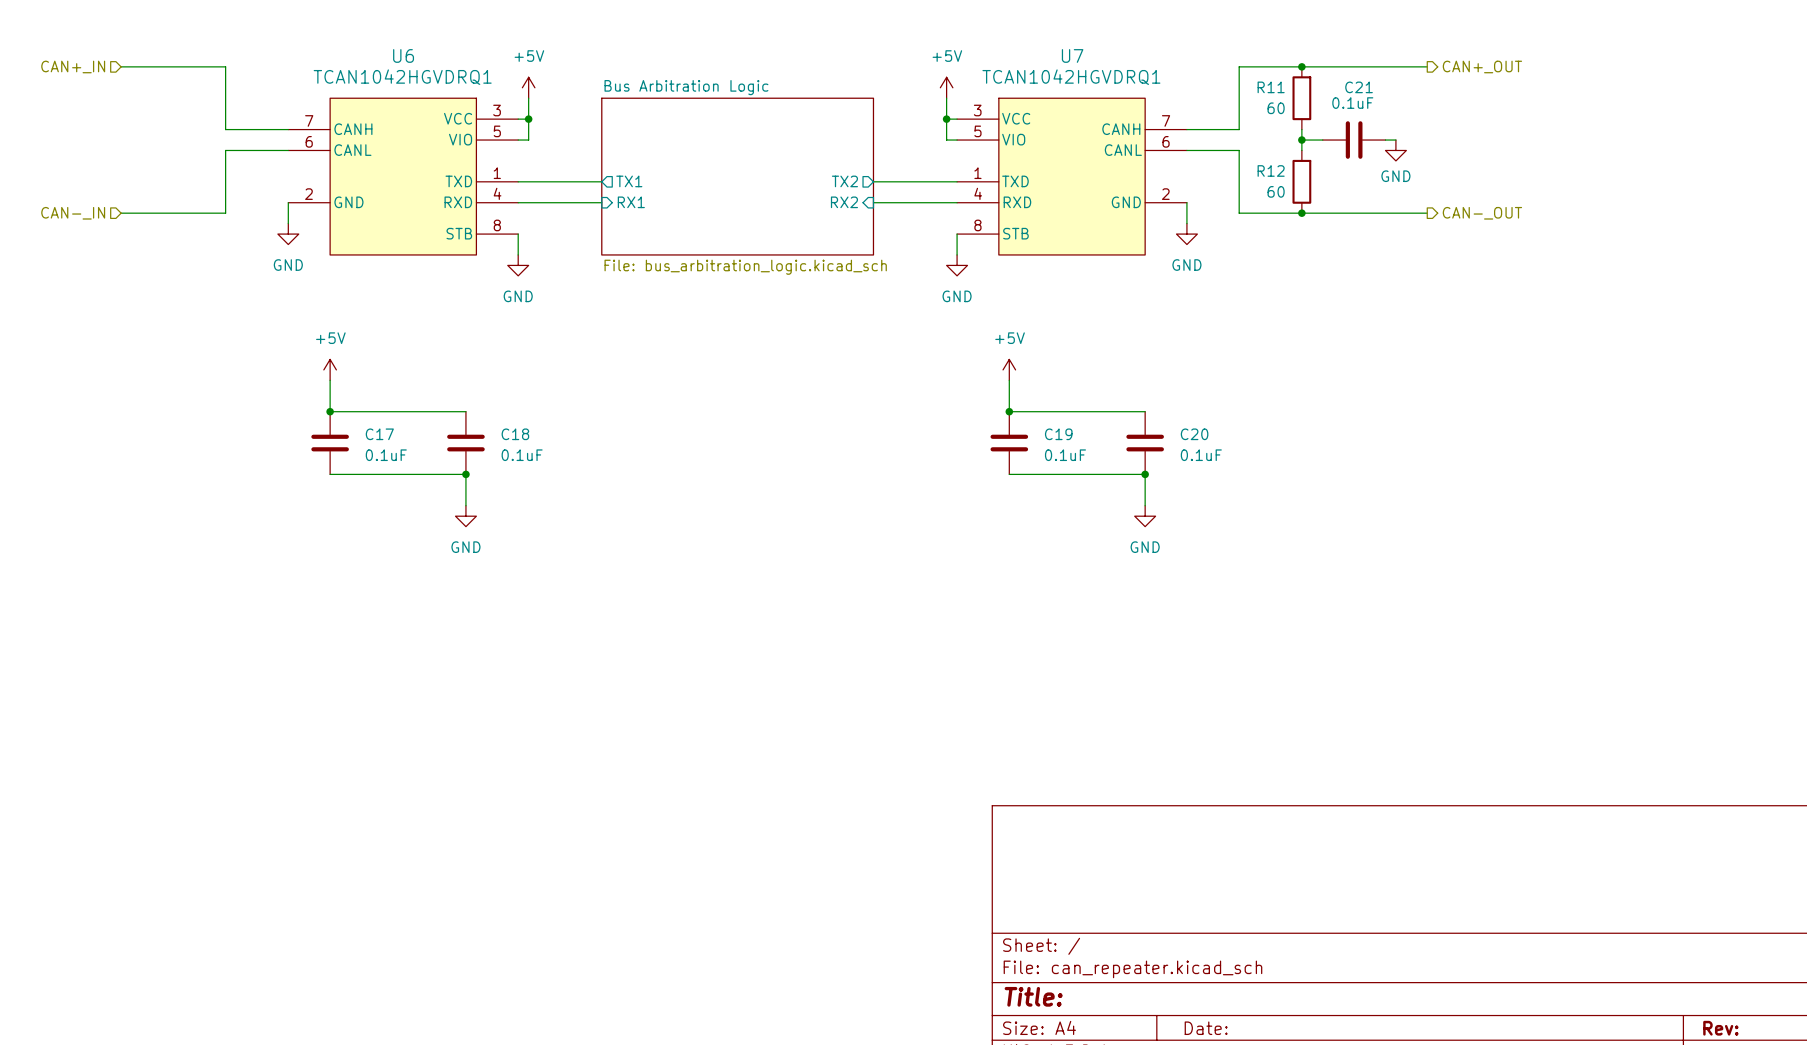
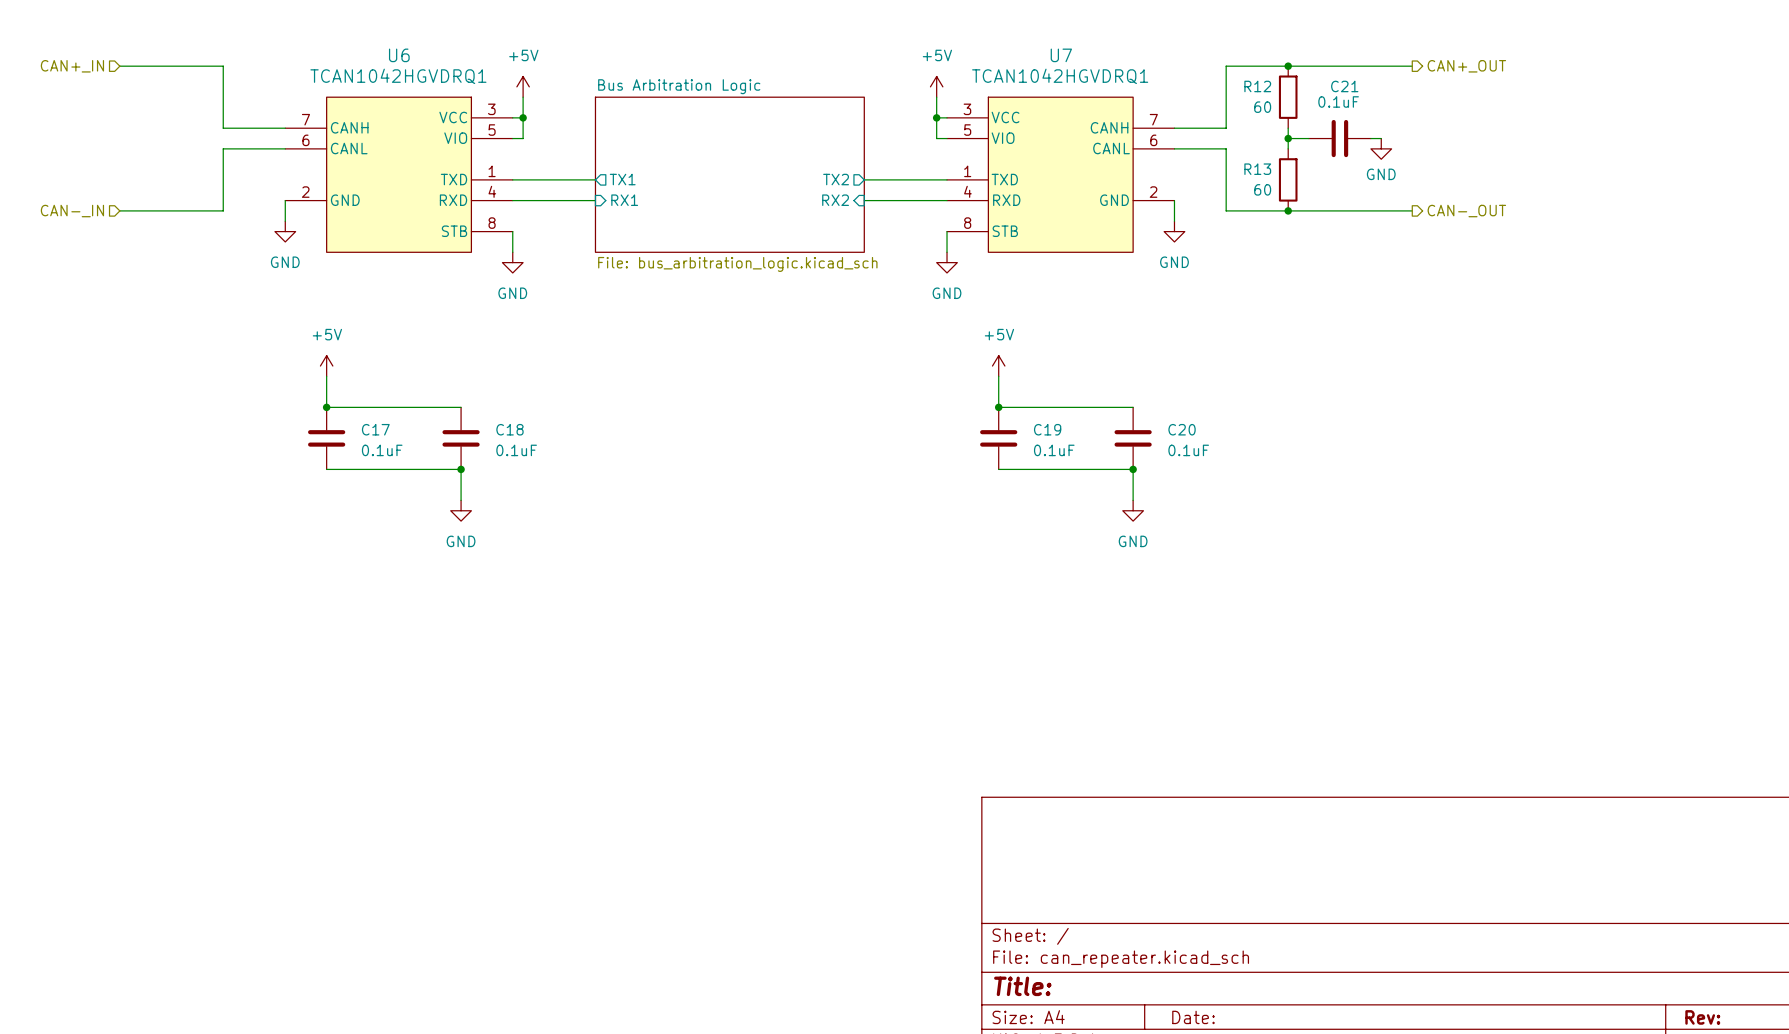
R11 name: R11 (1271, 87) -> R12 (1257, 86)
R12 name: R12 (1271, 170) -> R13 (1257, 169)

